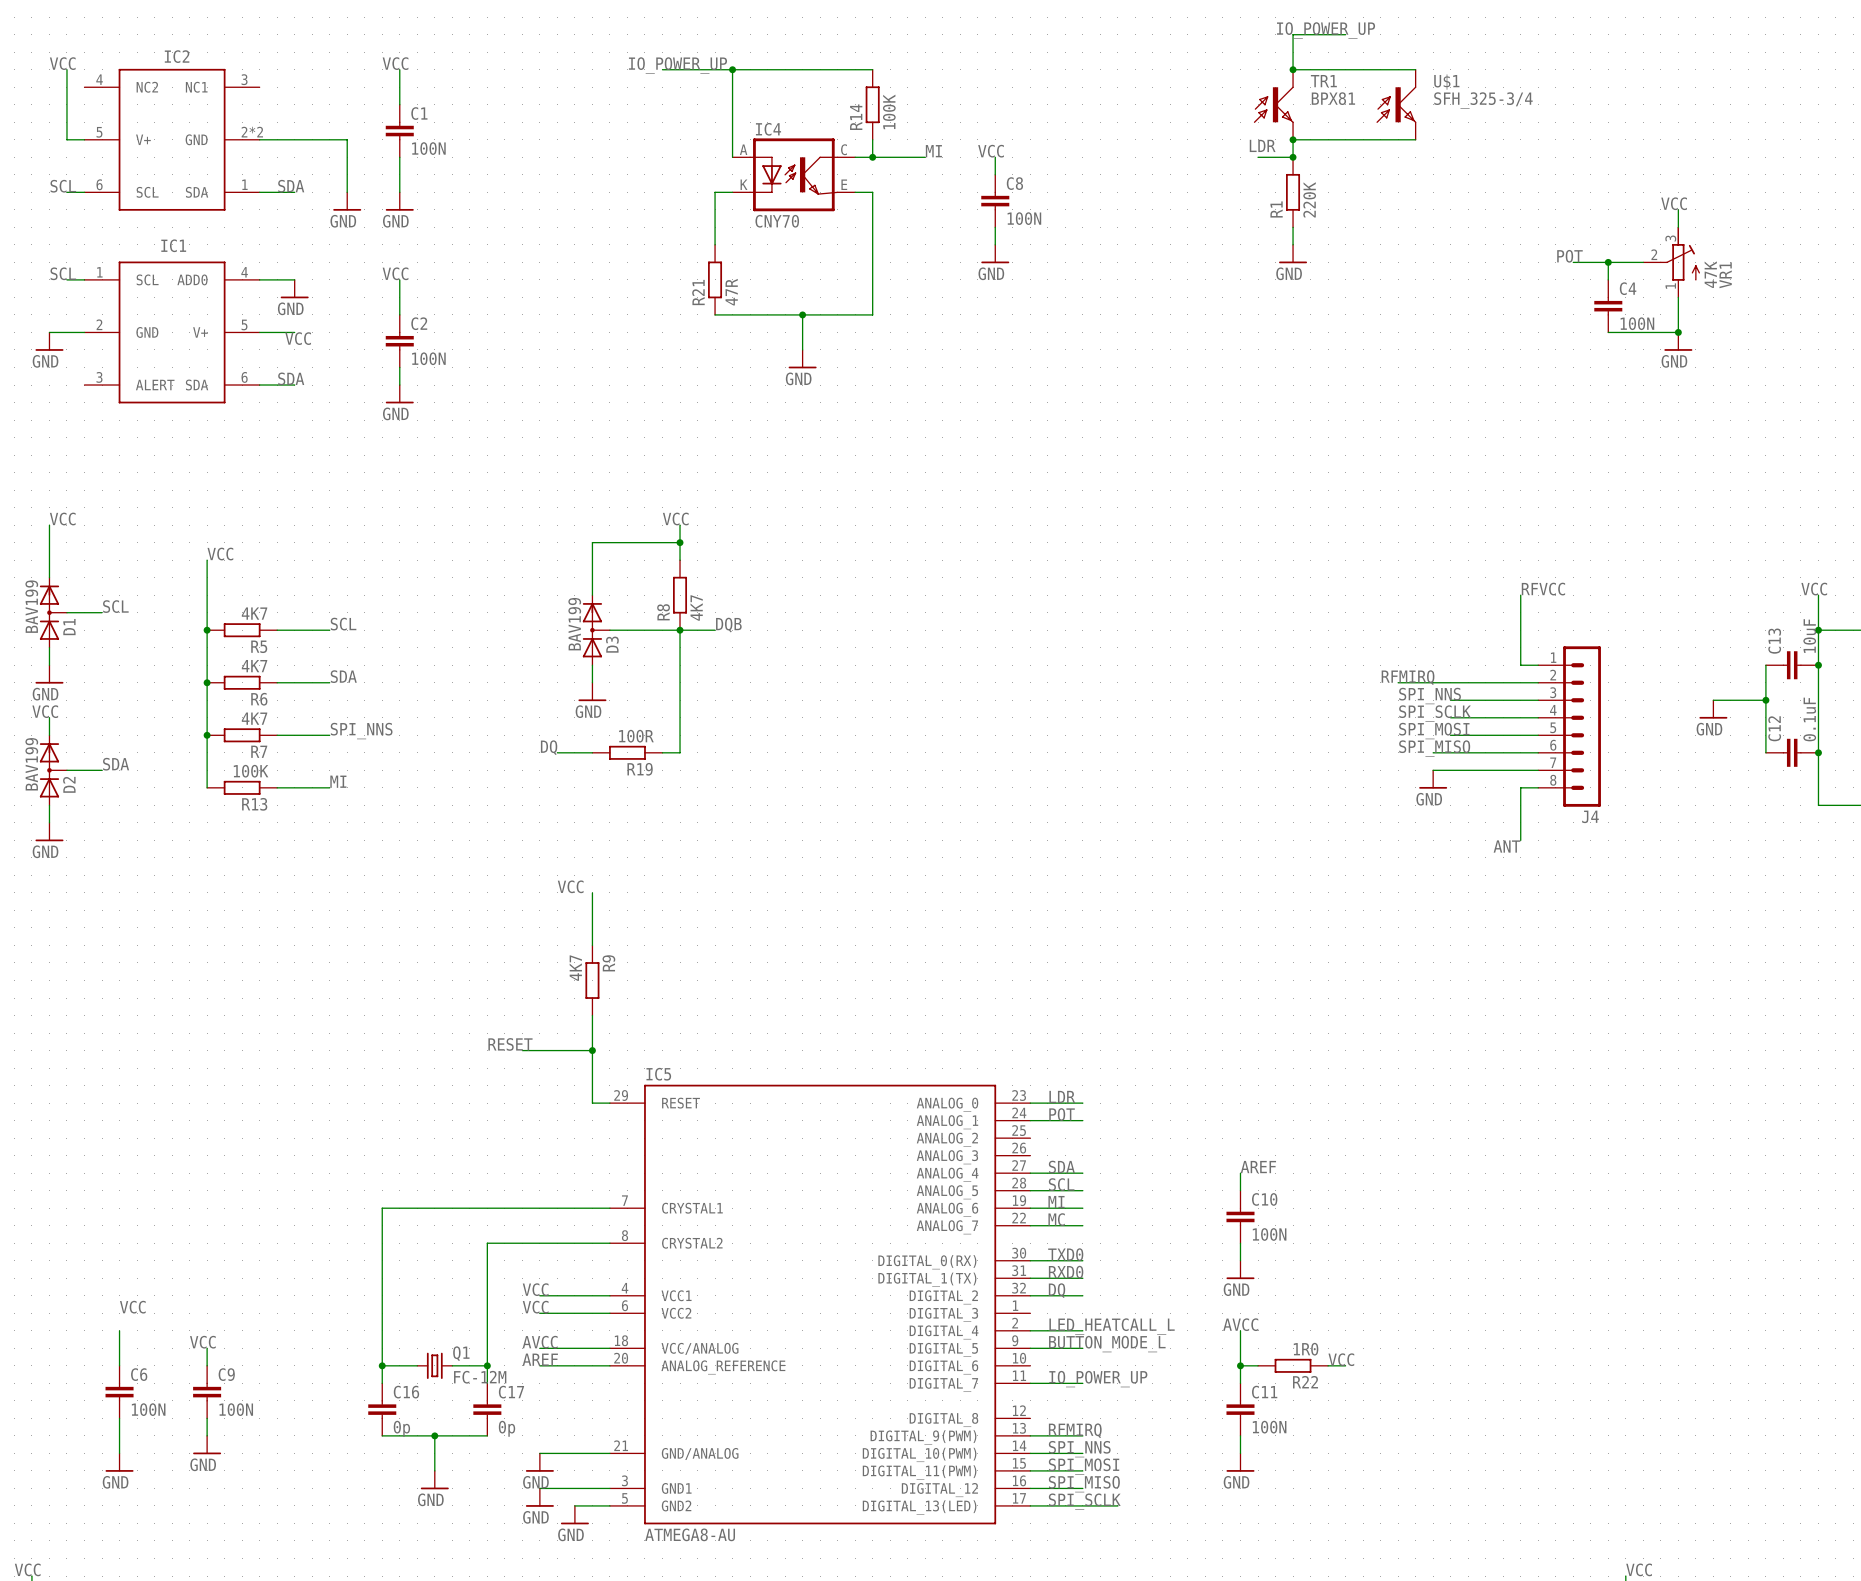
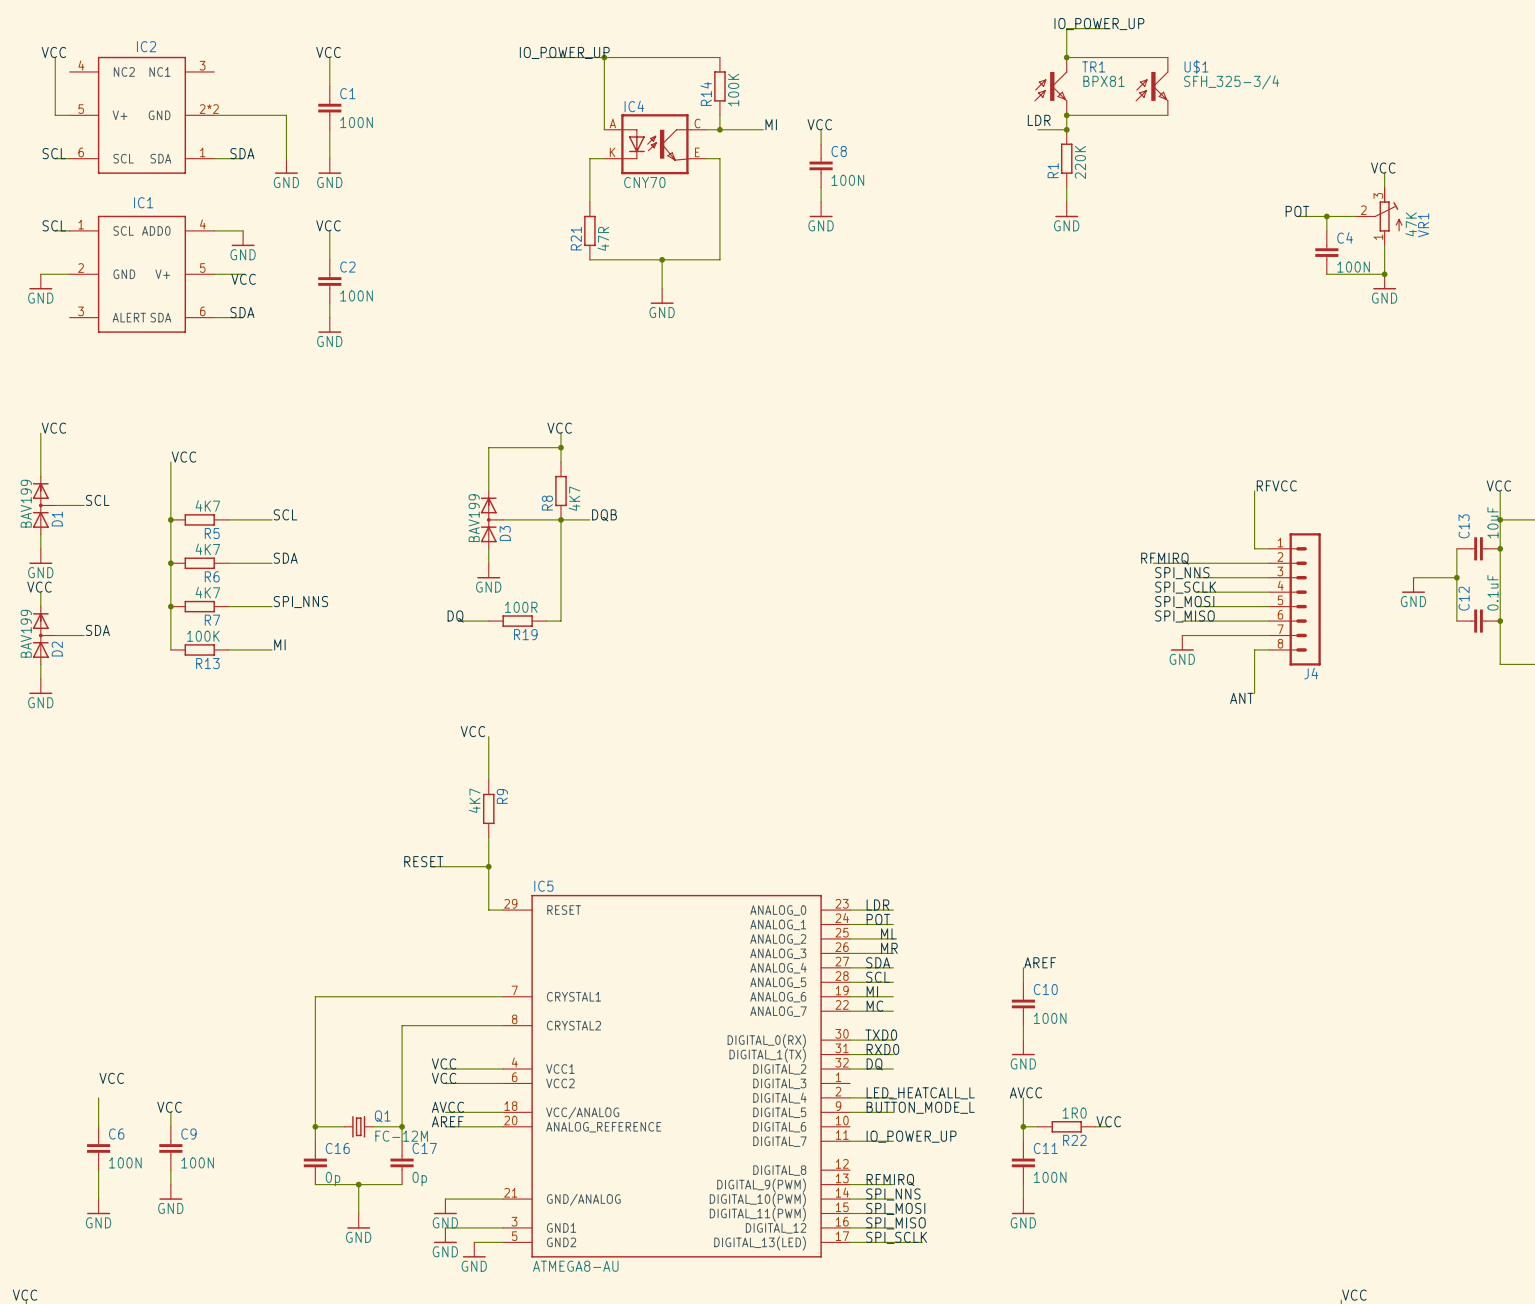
label: none -> ML (888, 933)
wire: none -> (849, 938) (893, 938)
label: none -> MR (889, 948)
wire: none -> (849, 953) (893, 953)

